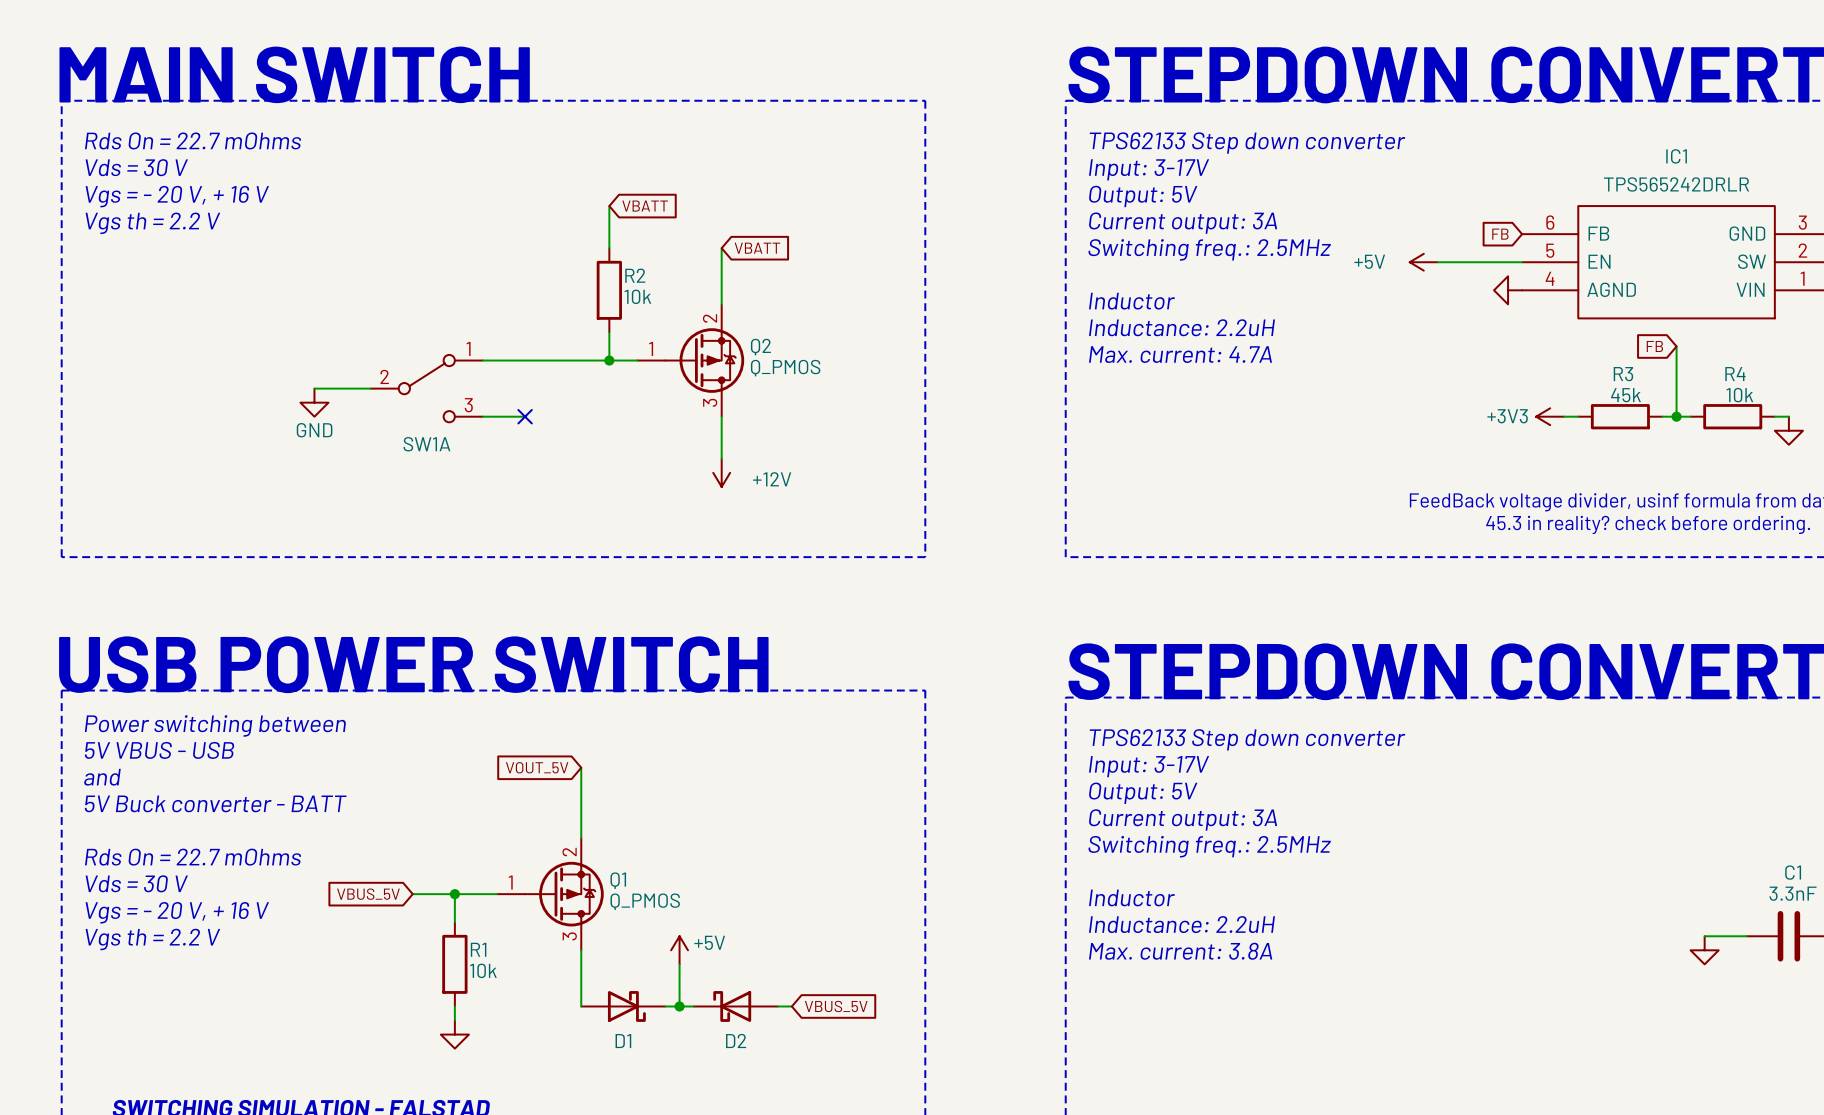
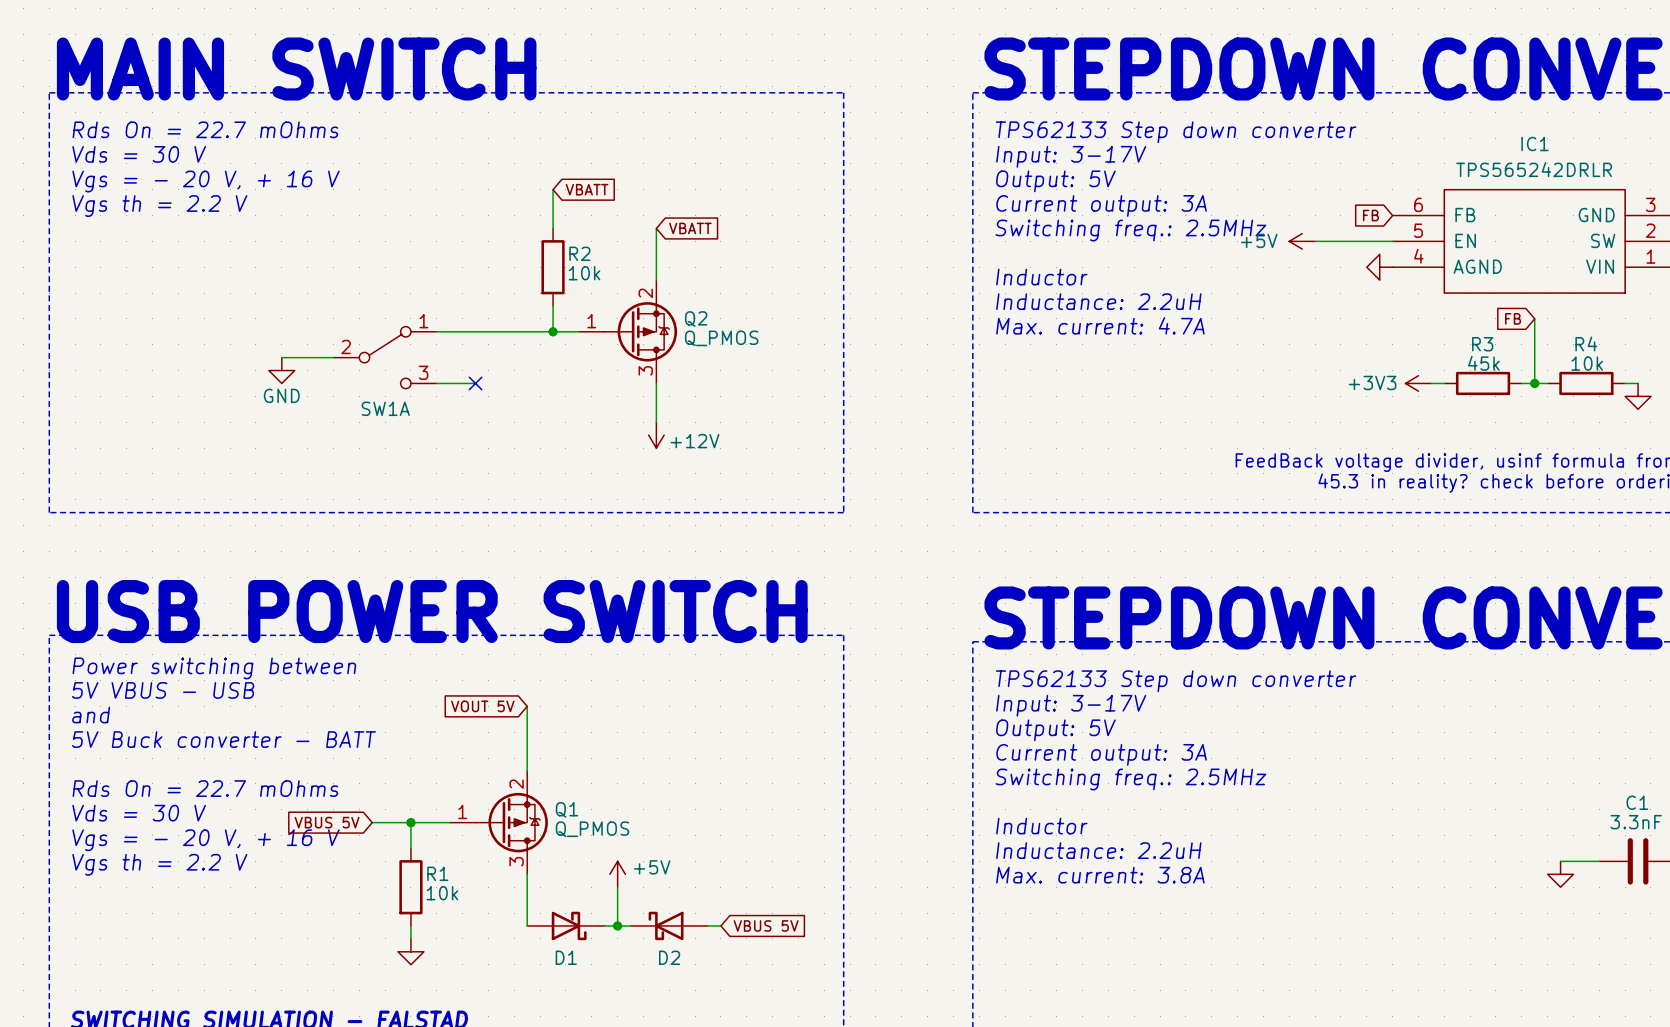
global label: VOUT_5V (537, 767) -> VOUT 5V (482, 706)
global label: VBUS_5V (368, 894) -> VBUS 5V (327, 822)
global label: VBUS_5V (836, 1006) -> VBUS 5V (766, 925)

